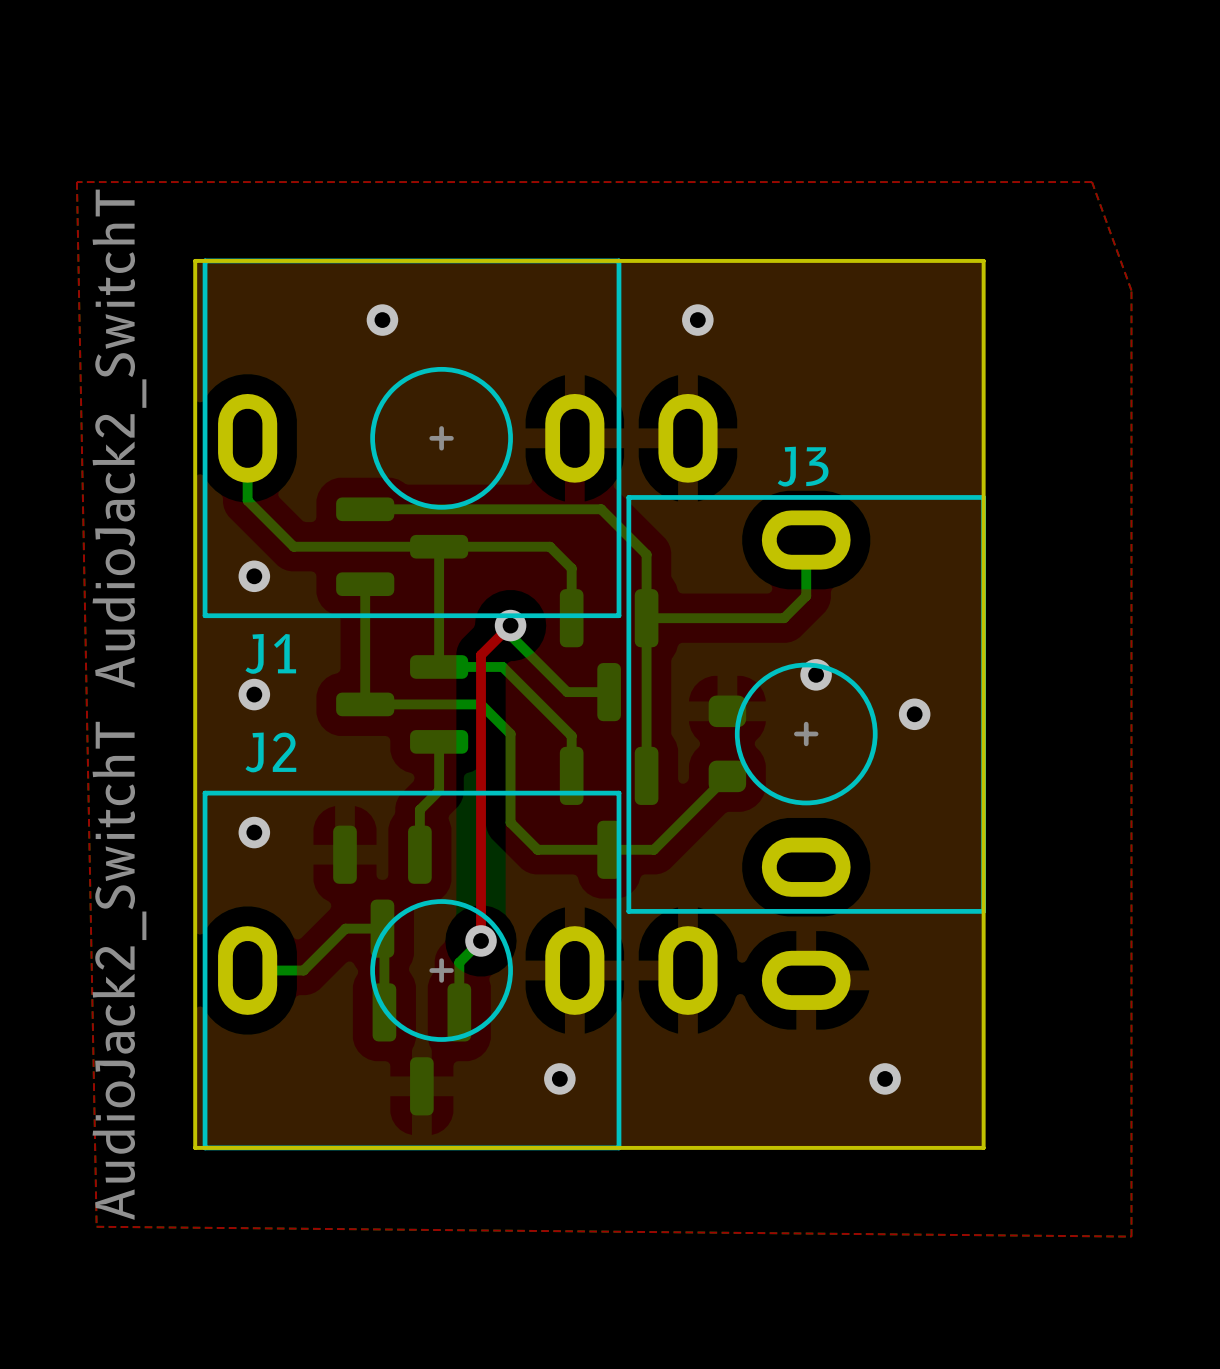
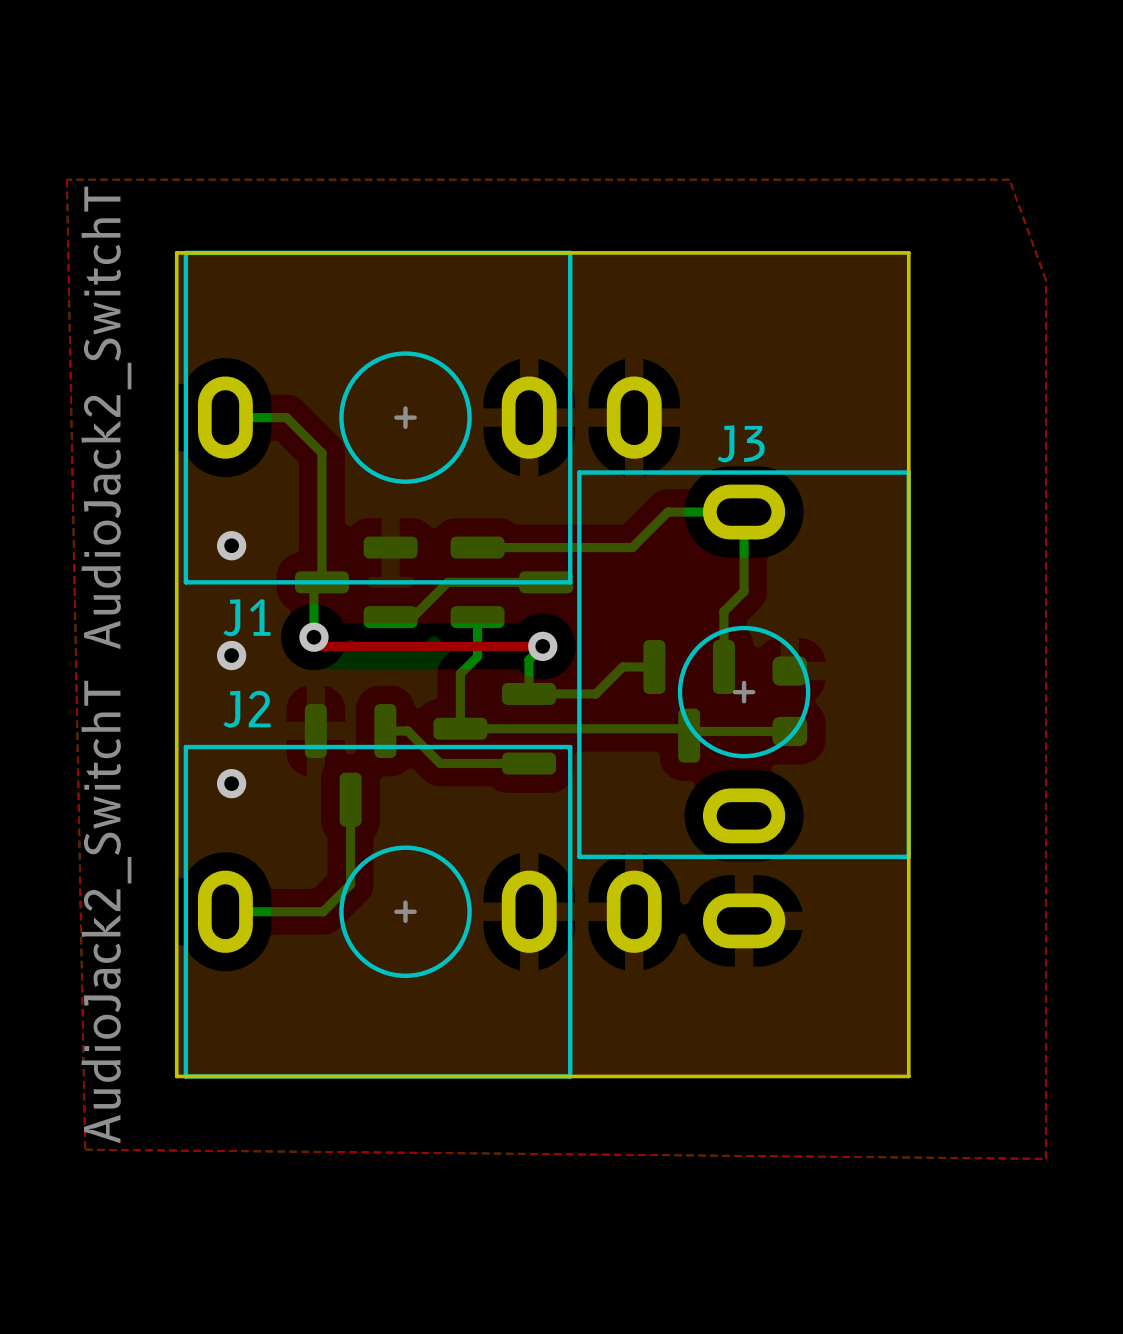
via: (382, 320) -> none
via: (697, 320) -> none
bottom track: (247, 438) (247, 500) (293, 546) (549, 546) (571, 568) (571, 618) -> (225, 417) (286, 417) (321, 453) (321, 582) (313, 590) (313, 637)
bottom track: (365, 509) (601, 509) (646, 554) (646, 775) -> none
bottom track: none -> (744, 512) (667, 512) (632, 547) (477, 547)
part: (402, 546) -> none
bottom track: (439, 546) (439, 666) (502, 666) (571, 735) (571, 775) -> none
bottom track: (365, 584) (365, 704) (481, 704) (510, 733) (510, 822) (537, 849) (653, 849) (727, 776) -> none
bottom track: (806, 596) (784, 618) (646, 618) -> (744, 564) (744, 591) (723, 611) (723, 666)
part: none -> (356, 582)
bottom track: none -> (546, 582) (447, 582) (413, 617) (390, 617)
bottom track: (510, 625) (510, 635) (567, 692) (609, 692) -> none
top track: (510, 625) (481, 655) (481, 940) -> none
via: (510, 625) -> none
bottom track: none -> (477, 617) (477, 656) (460, 673) (460, 728) (682, 728) (689, 735) (693, 731) (789, 731)
part rotation: 0° (609, 655) -> 90° counterclockwise (511, 582)
top track: none -> (313, 637) (323, 646) (542, 646)
via: none -> (313, 637)
via: (816, 674) -> none
bottom track: none -> (542, 646) (529, 660) (529, 693) (595, 693) (622, 666) (654, 666)
via: none -> (542, 646)
part footprint: [708, 695, 747, 793] -> [643, 639, 735, 763]
part: (402, 704) -> none
via: (914, 714) -> none
bottom track: (439, 741) (439, 790) (419, 809) (419, 854) -> none
part: none -> (789, 701)
part: none -> (494, 728)
bottom track: none -> (385, 731) (407, 731) (440, 763) (529, 763)
part: none -> (350, 765)
part: (609, 812) -> none
part: (382, 891) -> none
bottom track: (481, 940) (459, 962) (459, 1012) -> none
via: (481, 940) -> none
bottom track: (303, 970) (345, 928) (382, 928) (384, 930) (384, 1012) -> (277, 911) (323, 911) (350, 884) (350, 799)
part: (421, 1049) -> none
via: (559, 1078) -> none
via: (885, 1078) -> none

